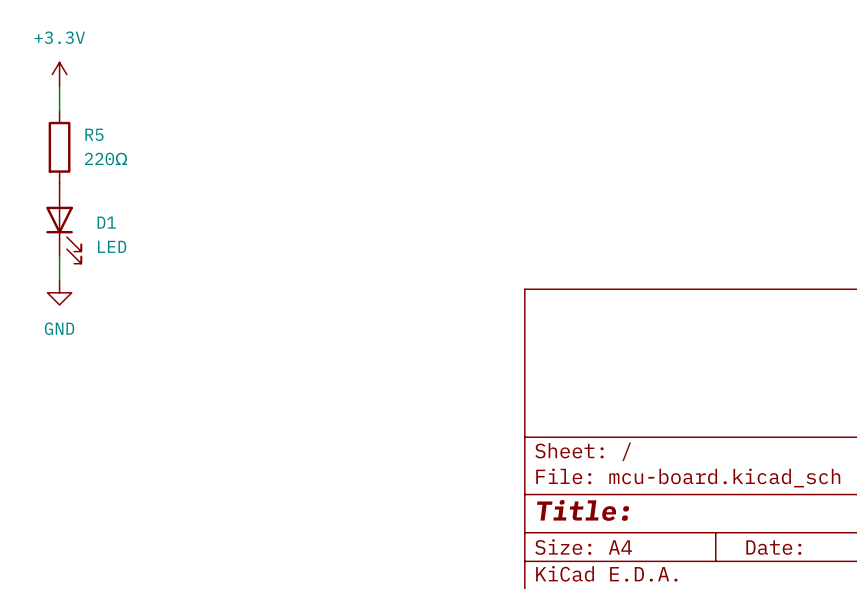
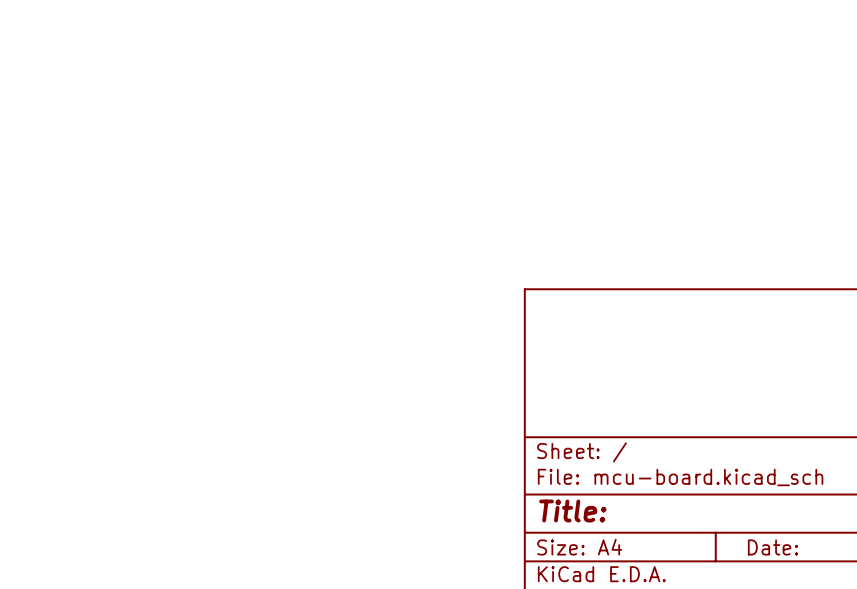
power symbol: +3.3V (59, 74) -> none
wire: (59, 86) (59, 110) -> none
R5: 220Ω (59, 147) -> none
D1: LED (63, 223) -> none
wire: (59, 256) (59, 280) -> none
power symbol: GND (59, 292) -> none

